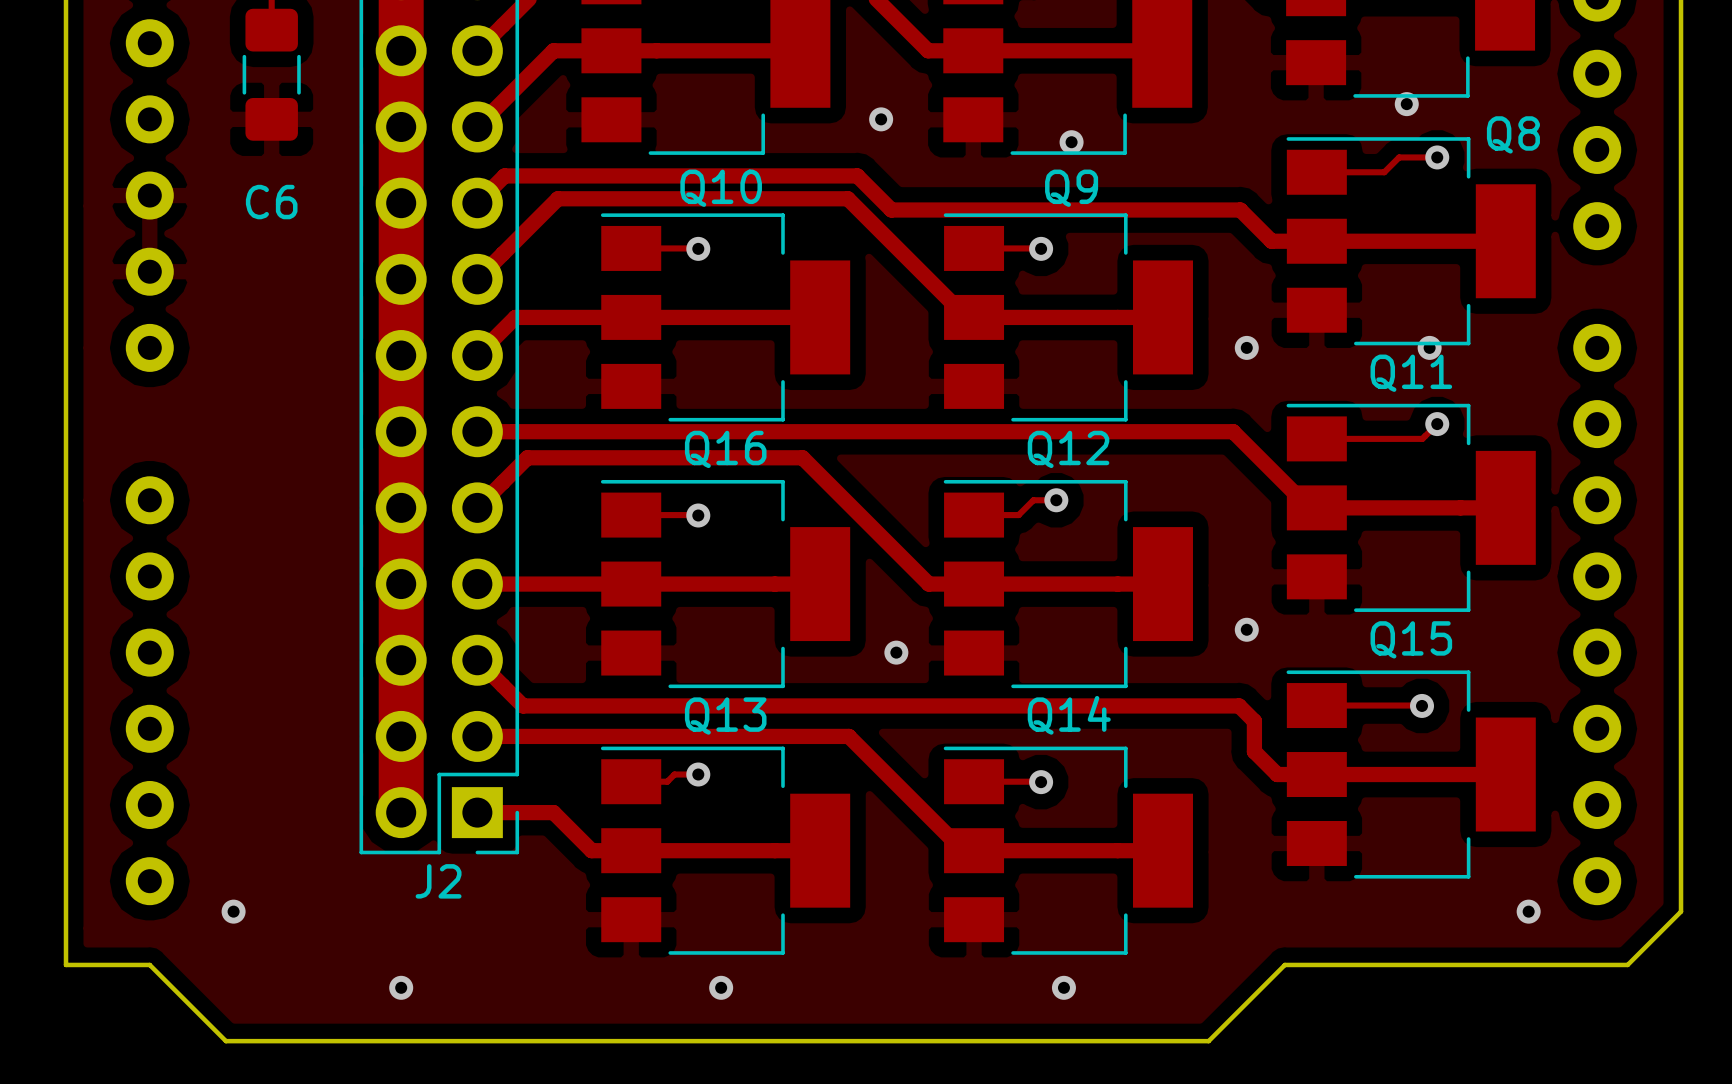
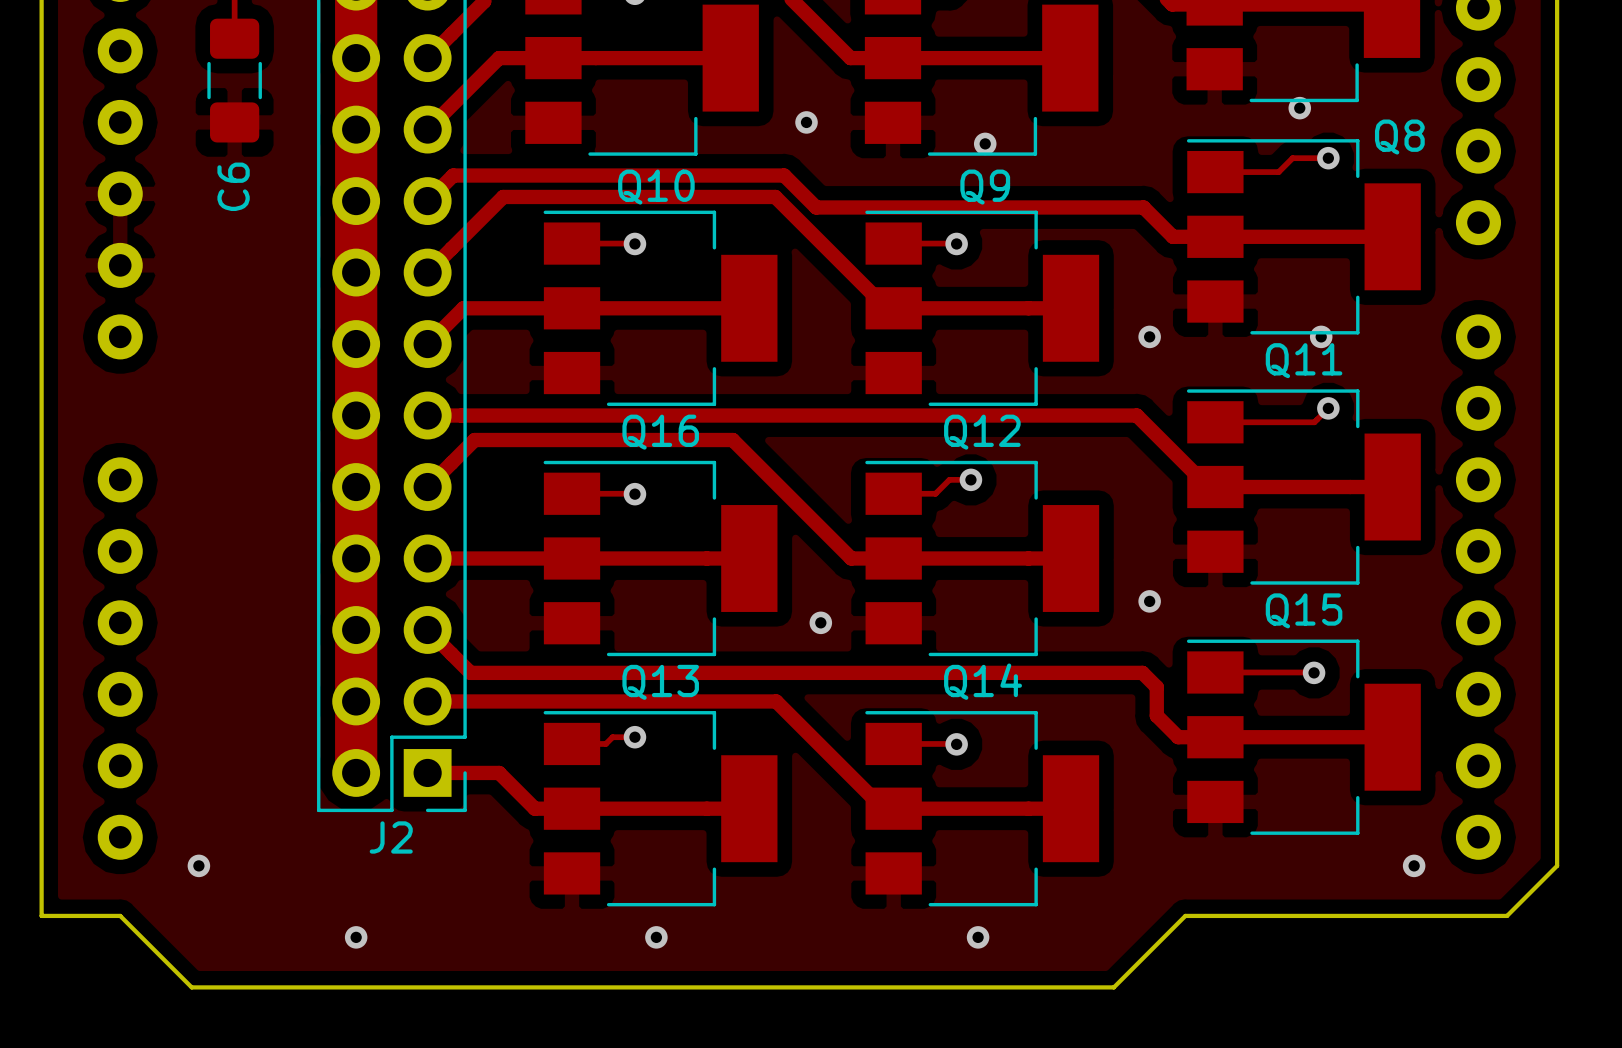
C6 name rotation: 0° (271, 202) -> 90° counterclockwise (233, 186)

